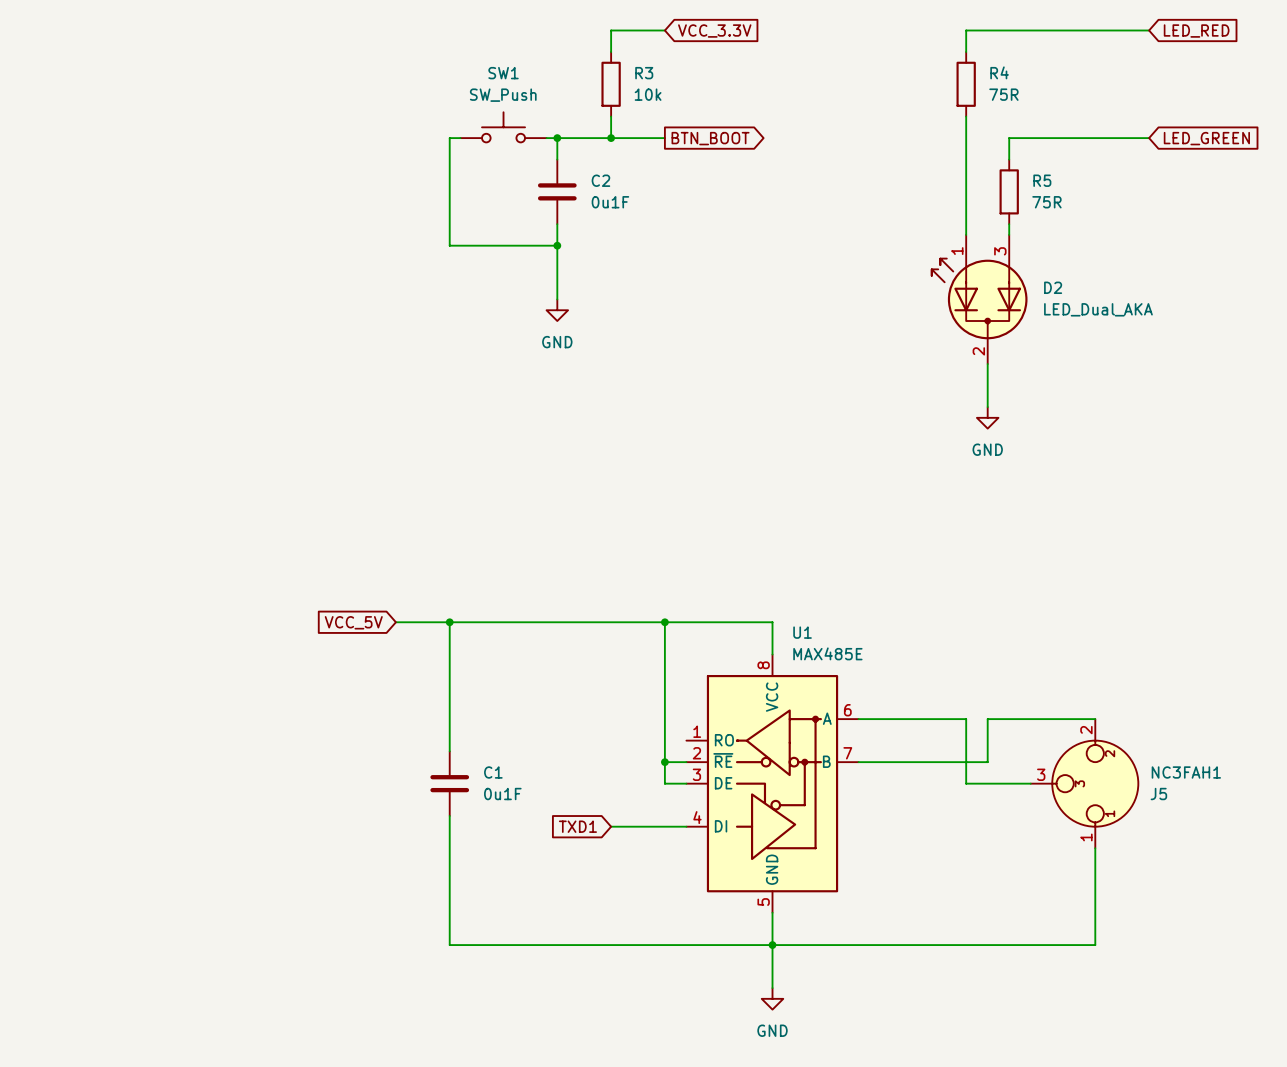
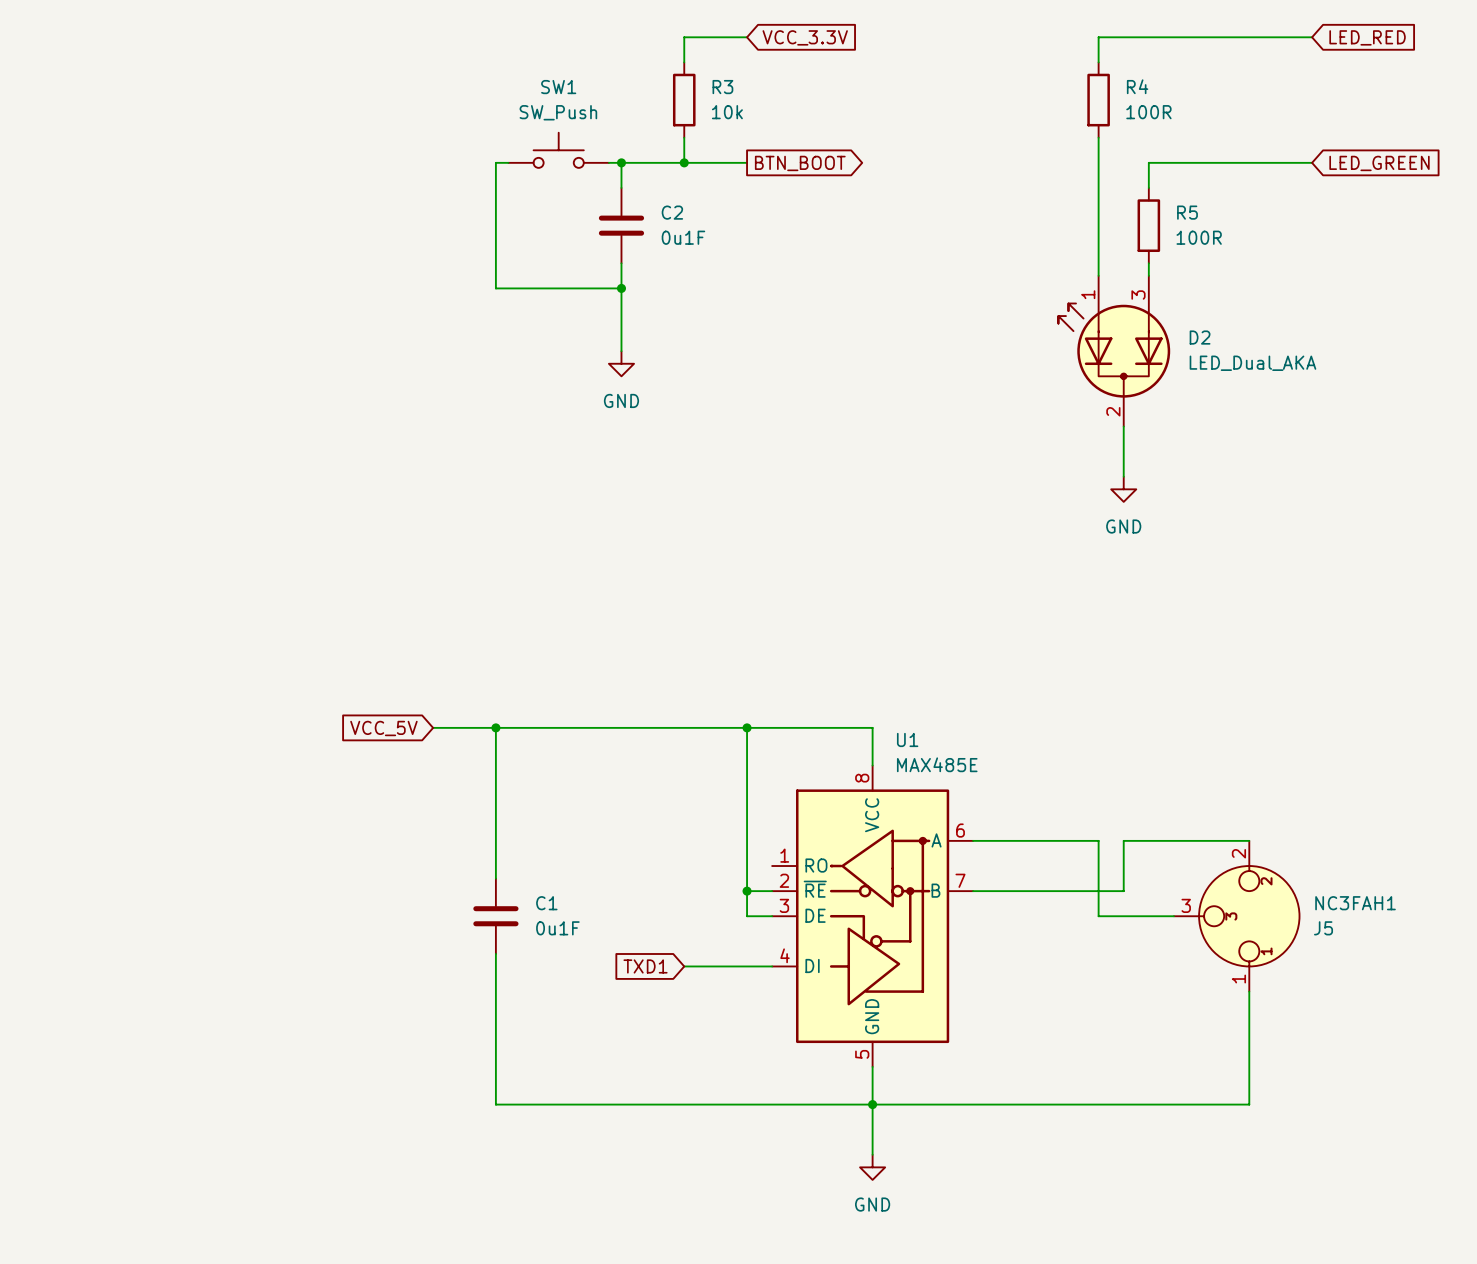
R4 value: 75R (1003, 94) -> 100R (1148, 112)
R5 value: 75R (1046, 202) -> 100R (1199, 237)

